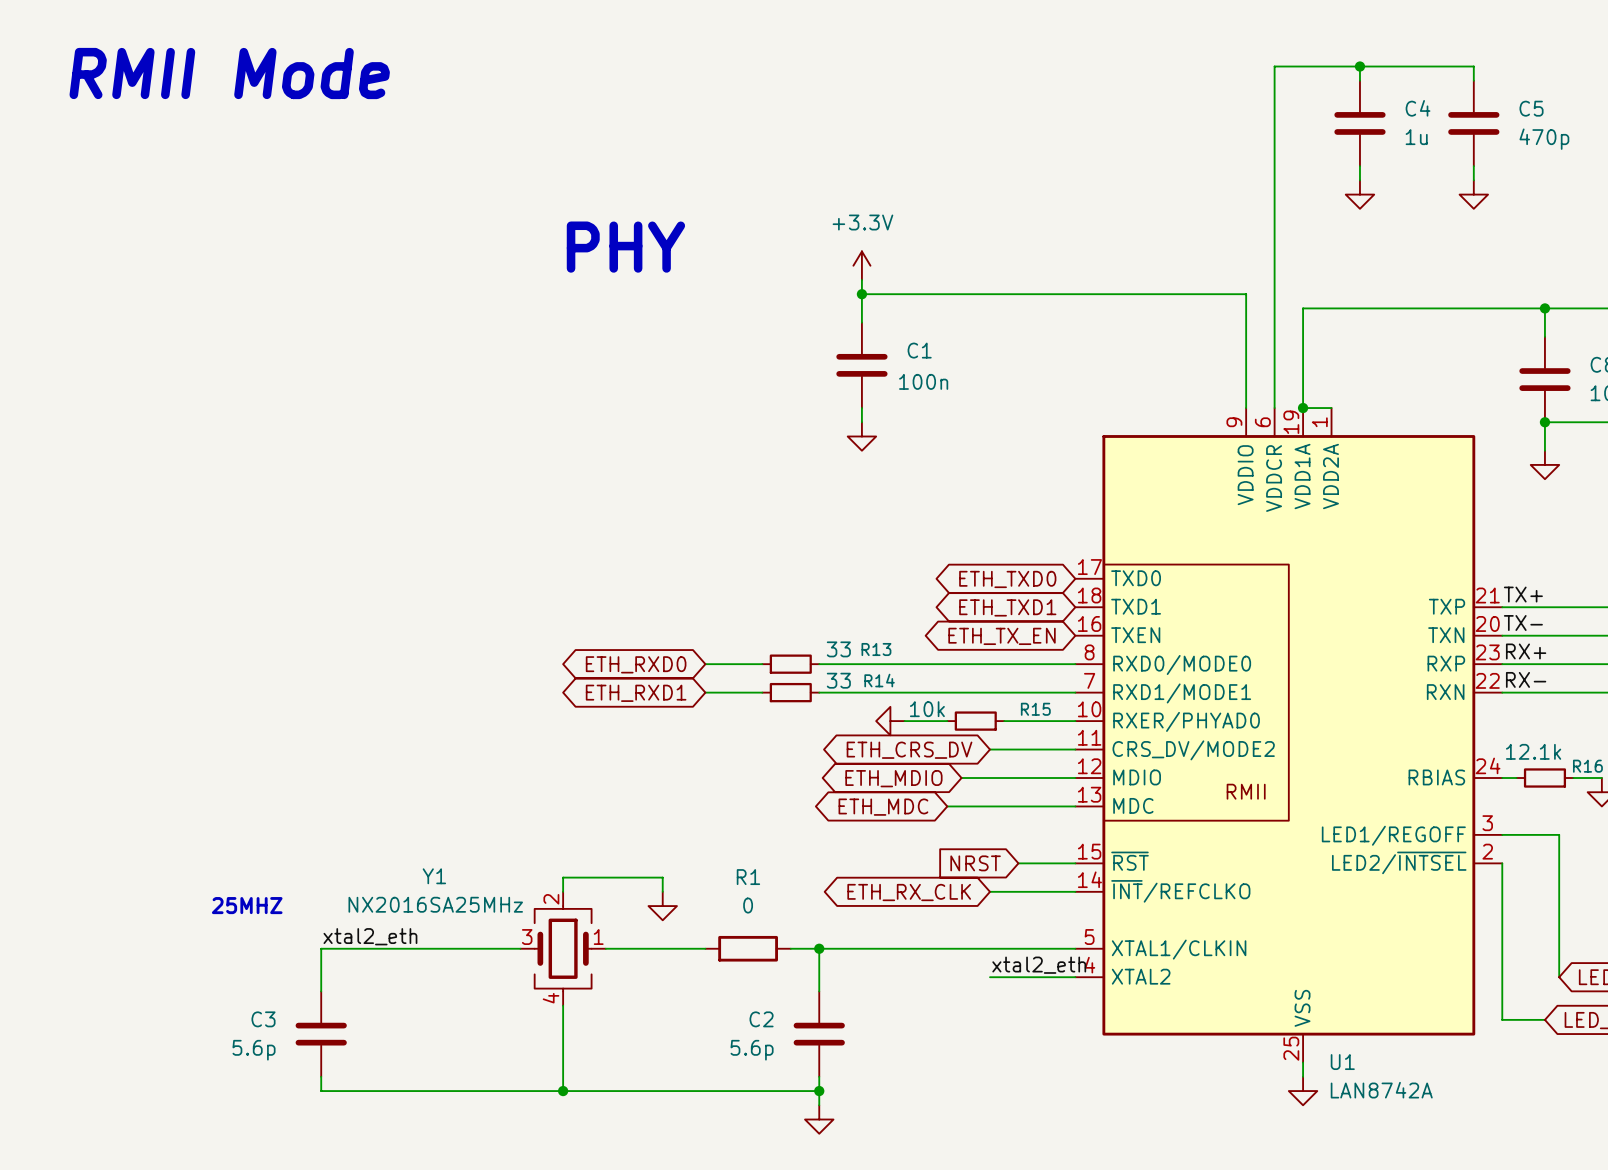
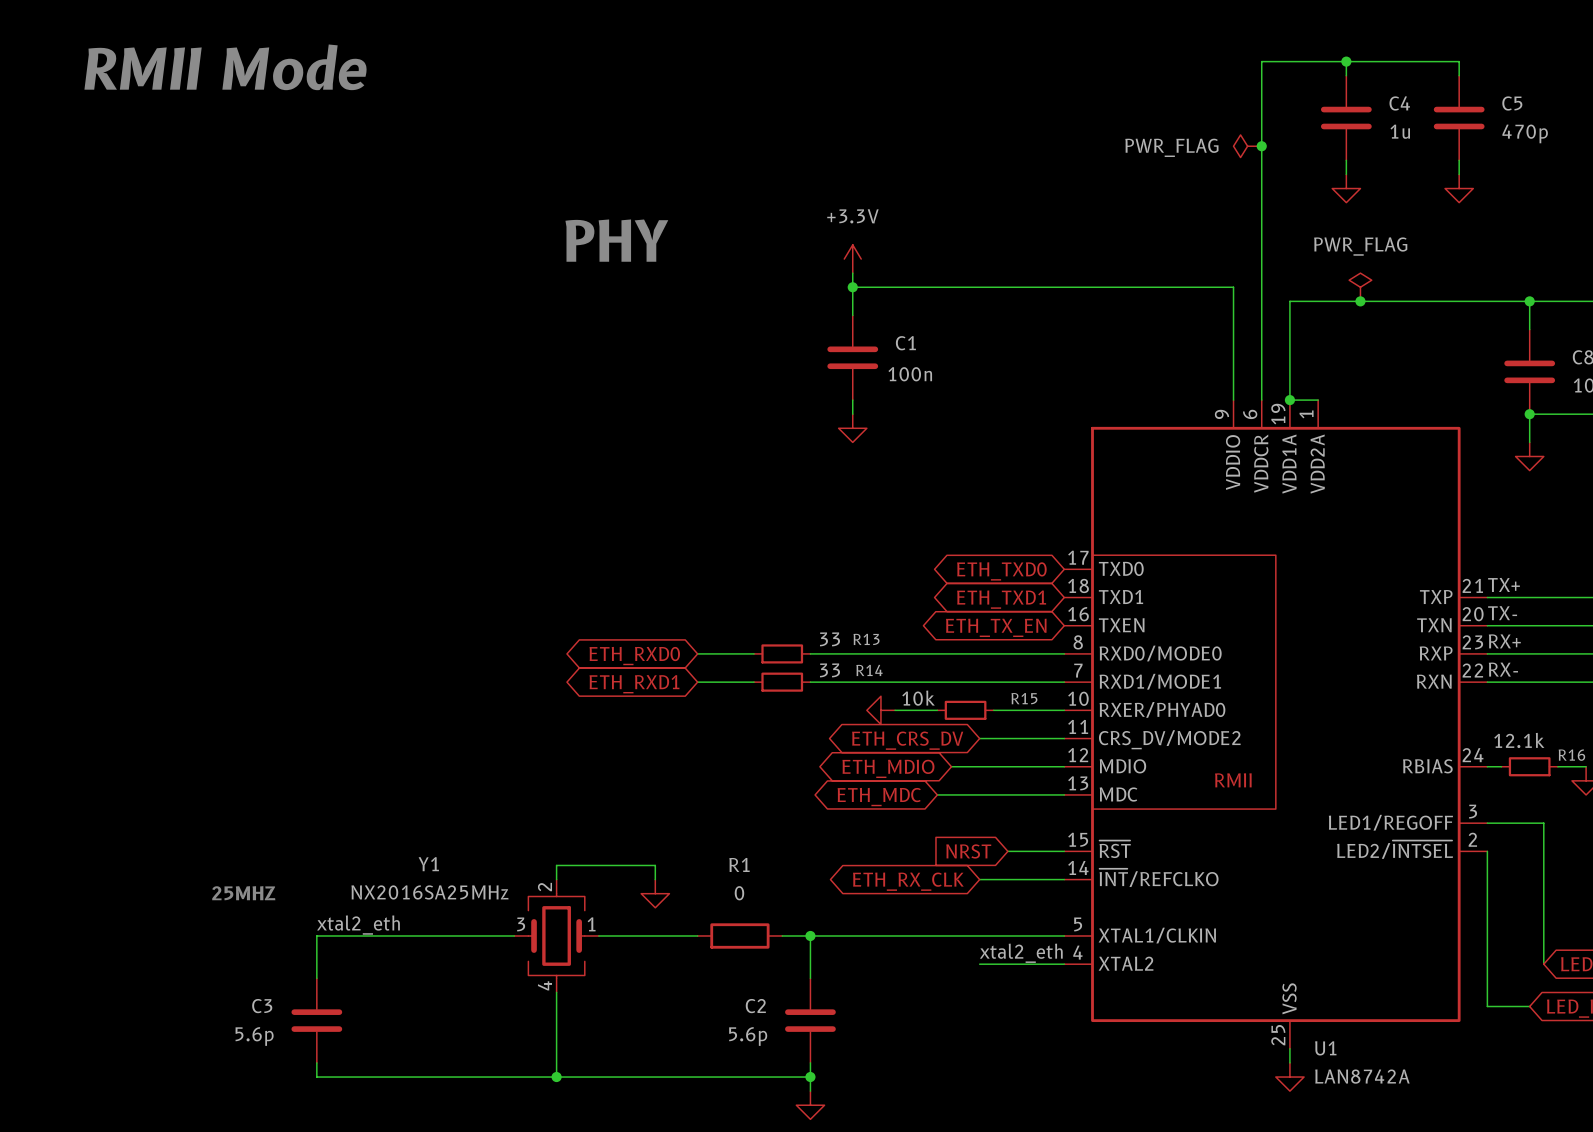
power symbol: none -> PWR_FLAG (1247, 146)
junction: none -> (1261, 146)
power symbol: none -> PWR_FLAG (1360, 287)
junction: none -> (1360, 301)

